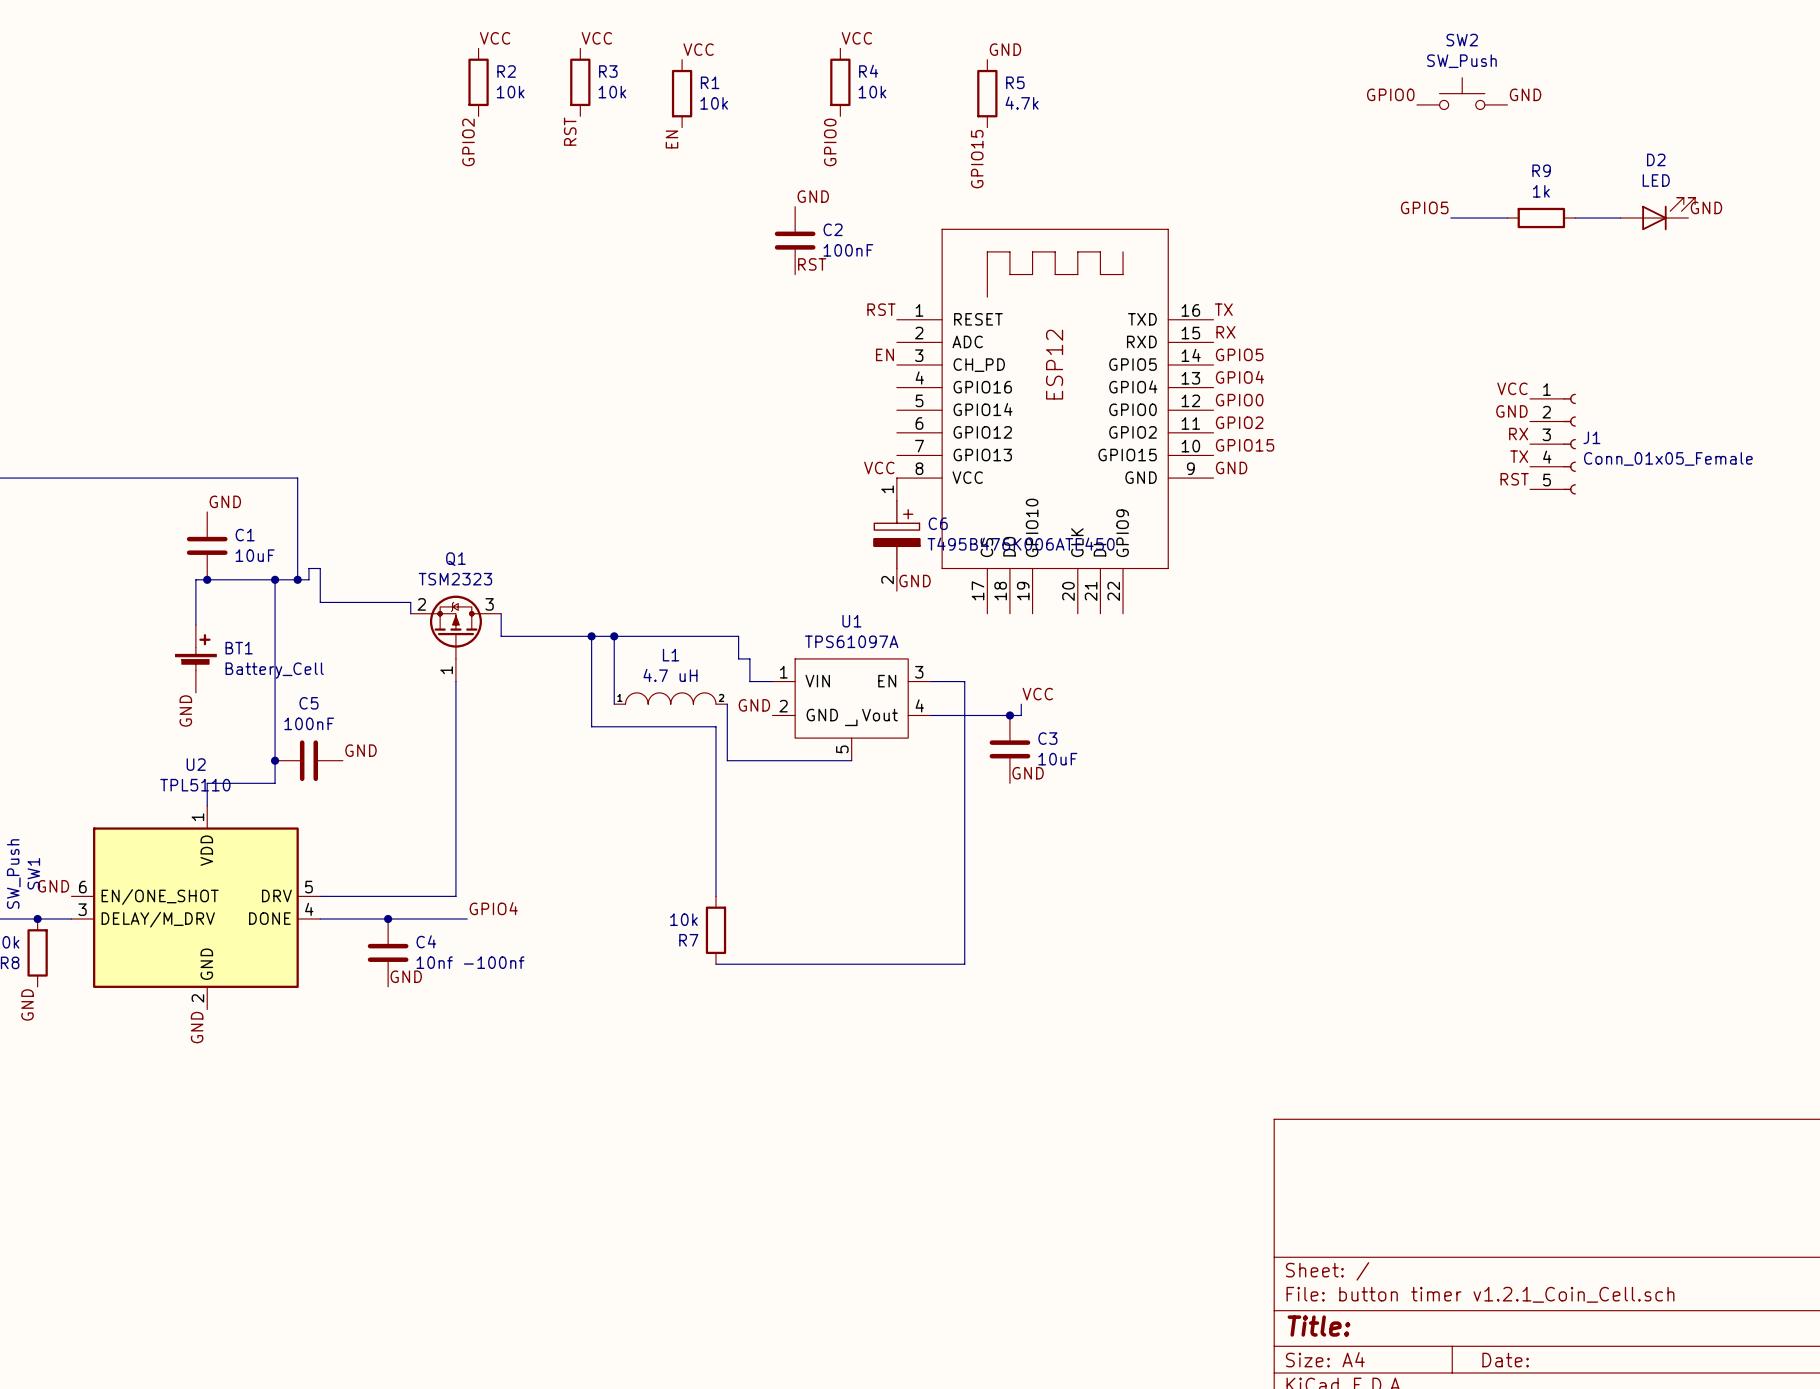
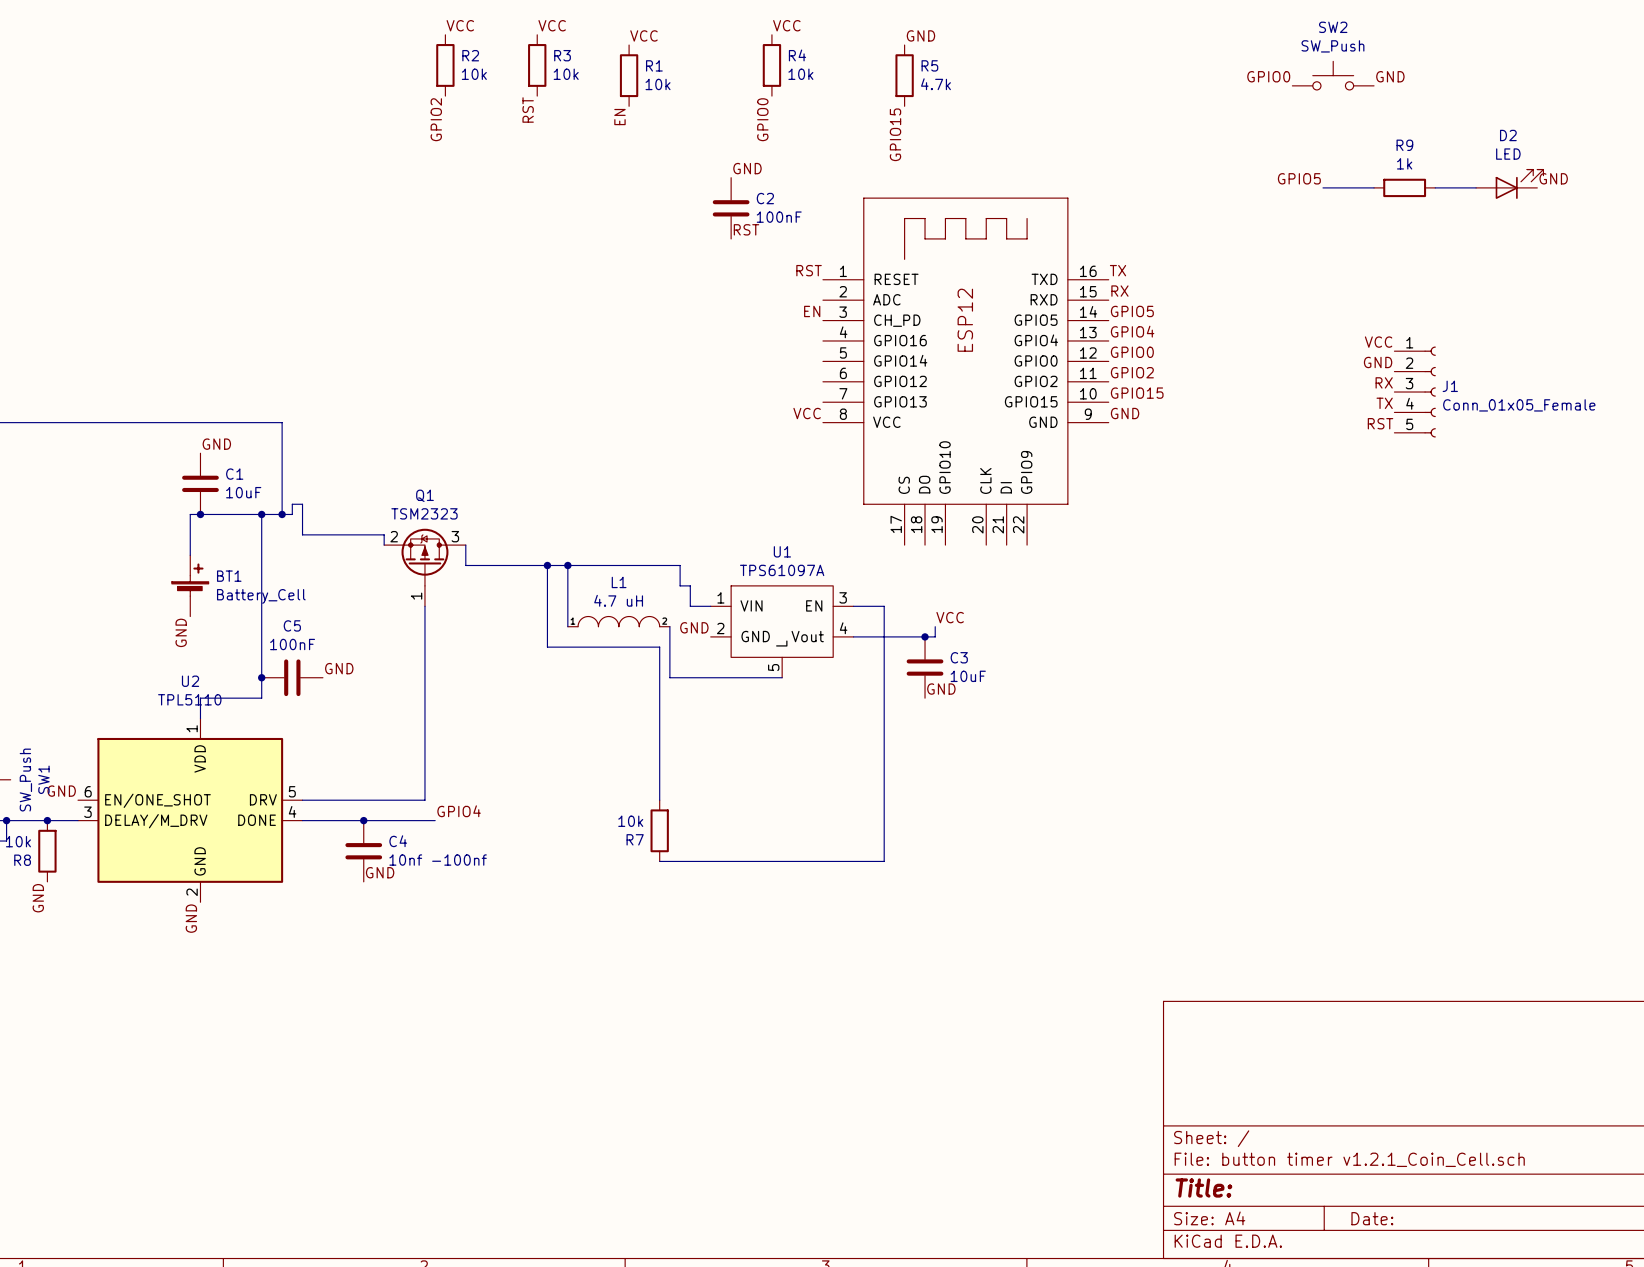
C6: T495B476K006ATE450 (896, 534) -> none
label: GND (915, 581) -> none

